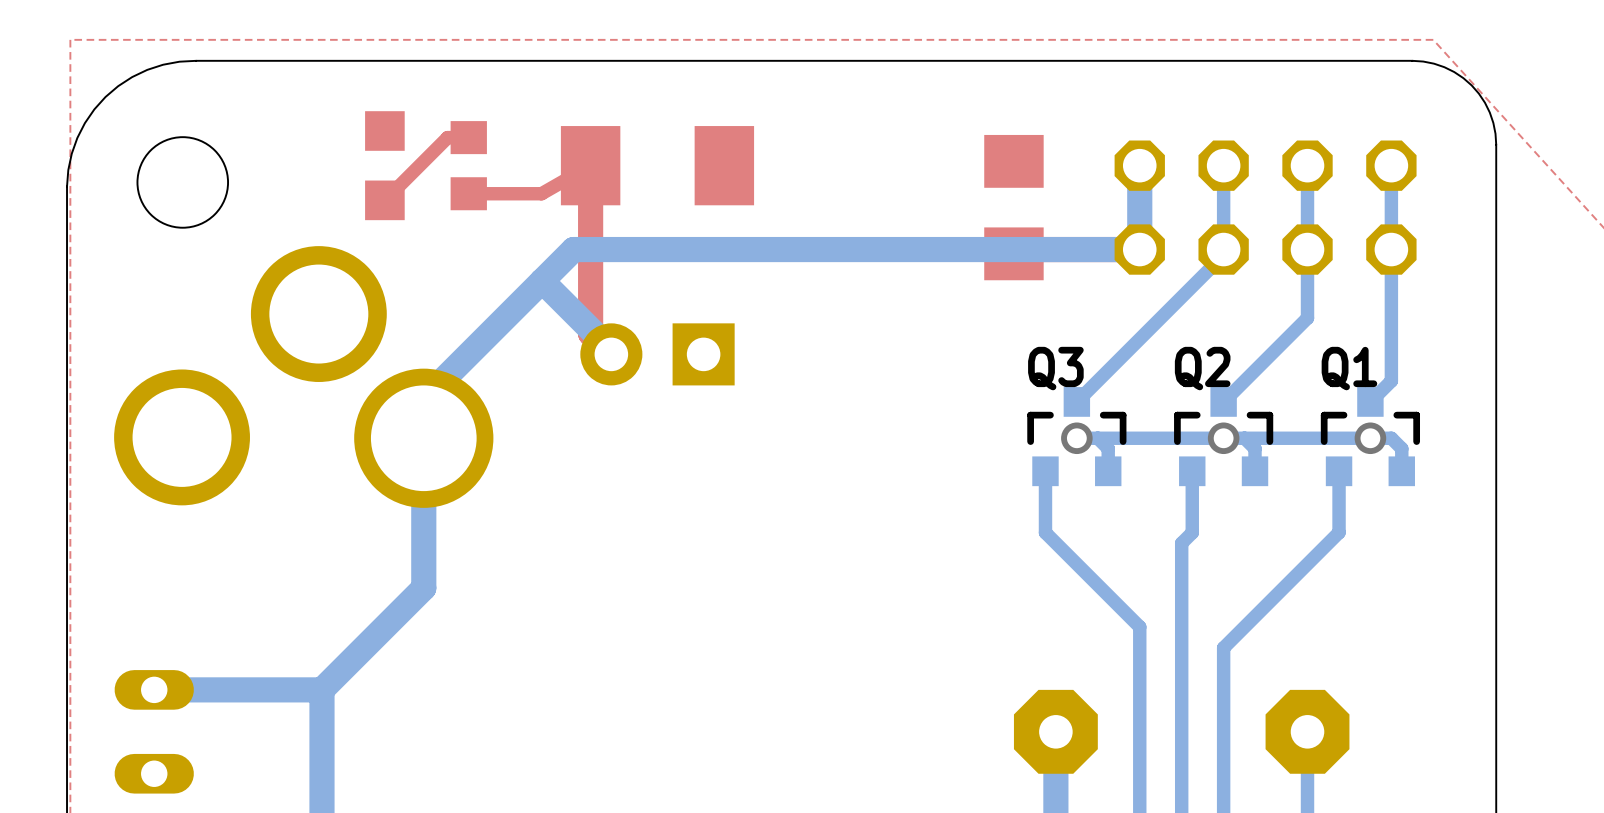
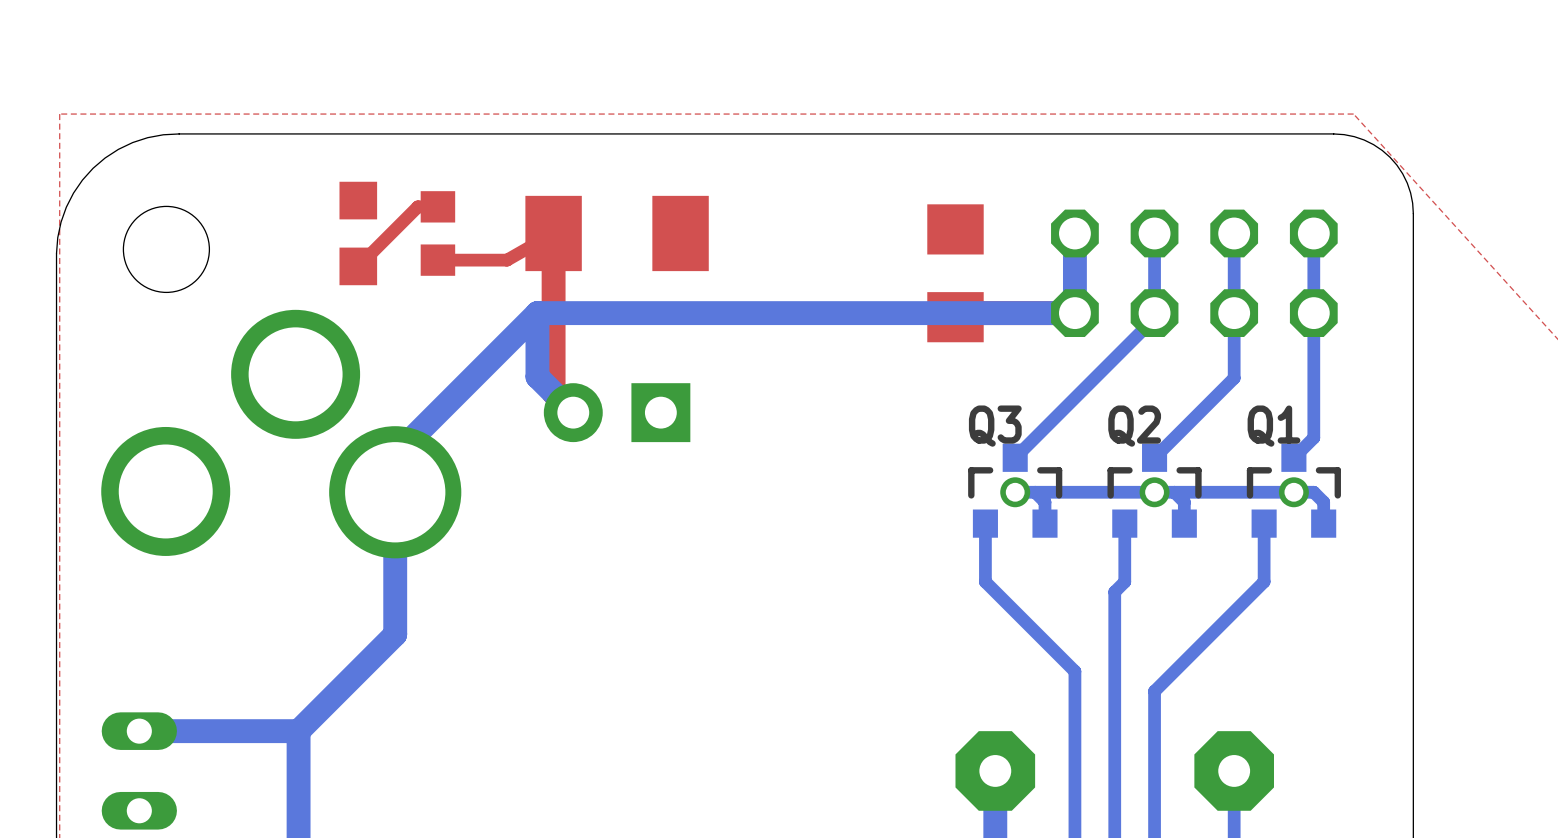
bottom track: (542, 280) (611, 350) (611, 354) -> (537, 313) (537, 376) (573, 412)

